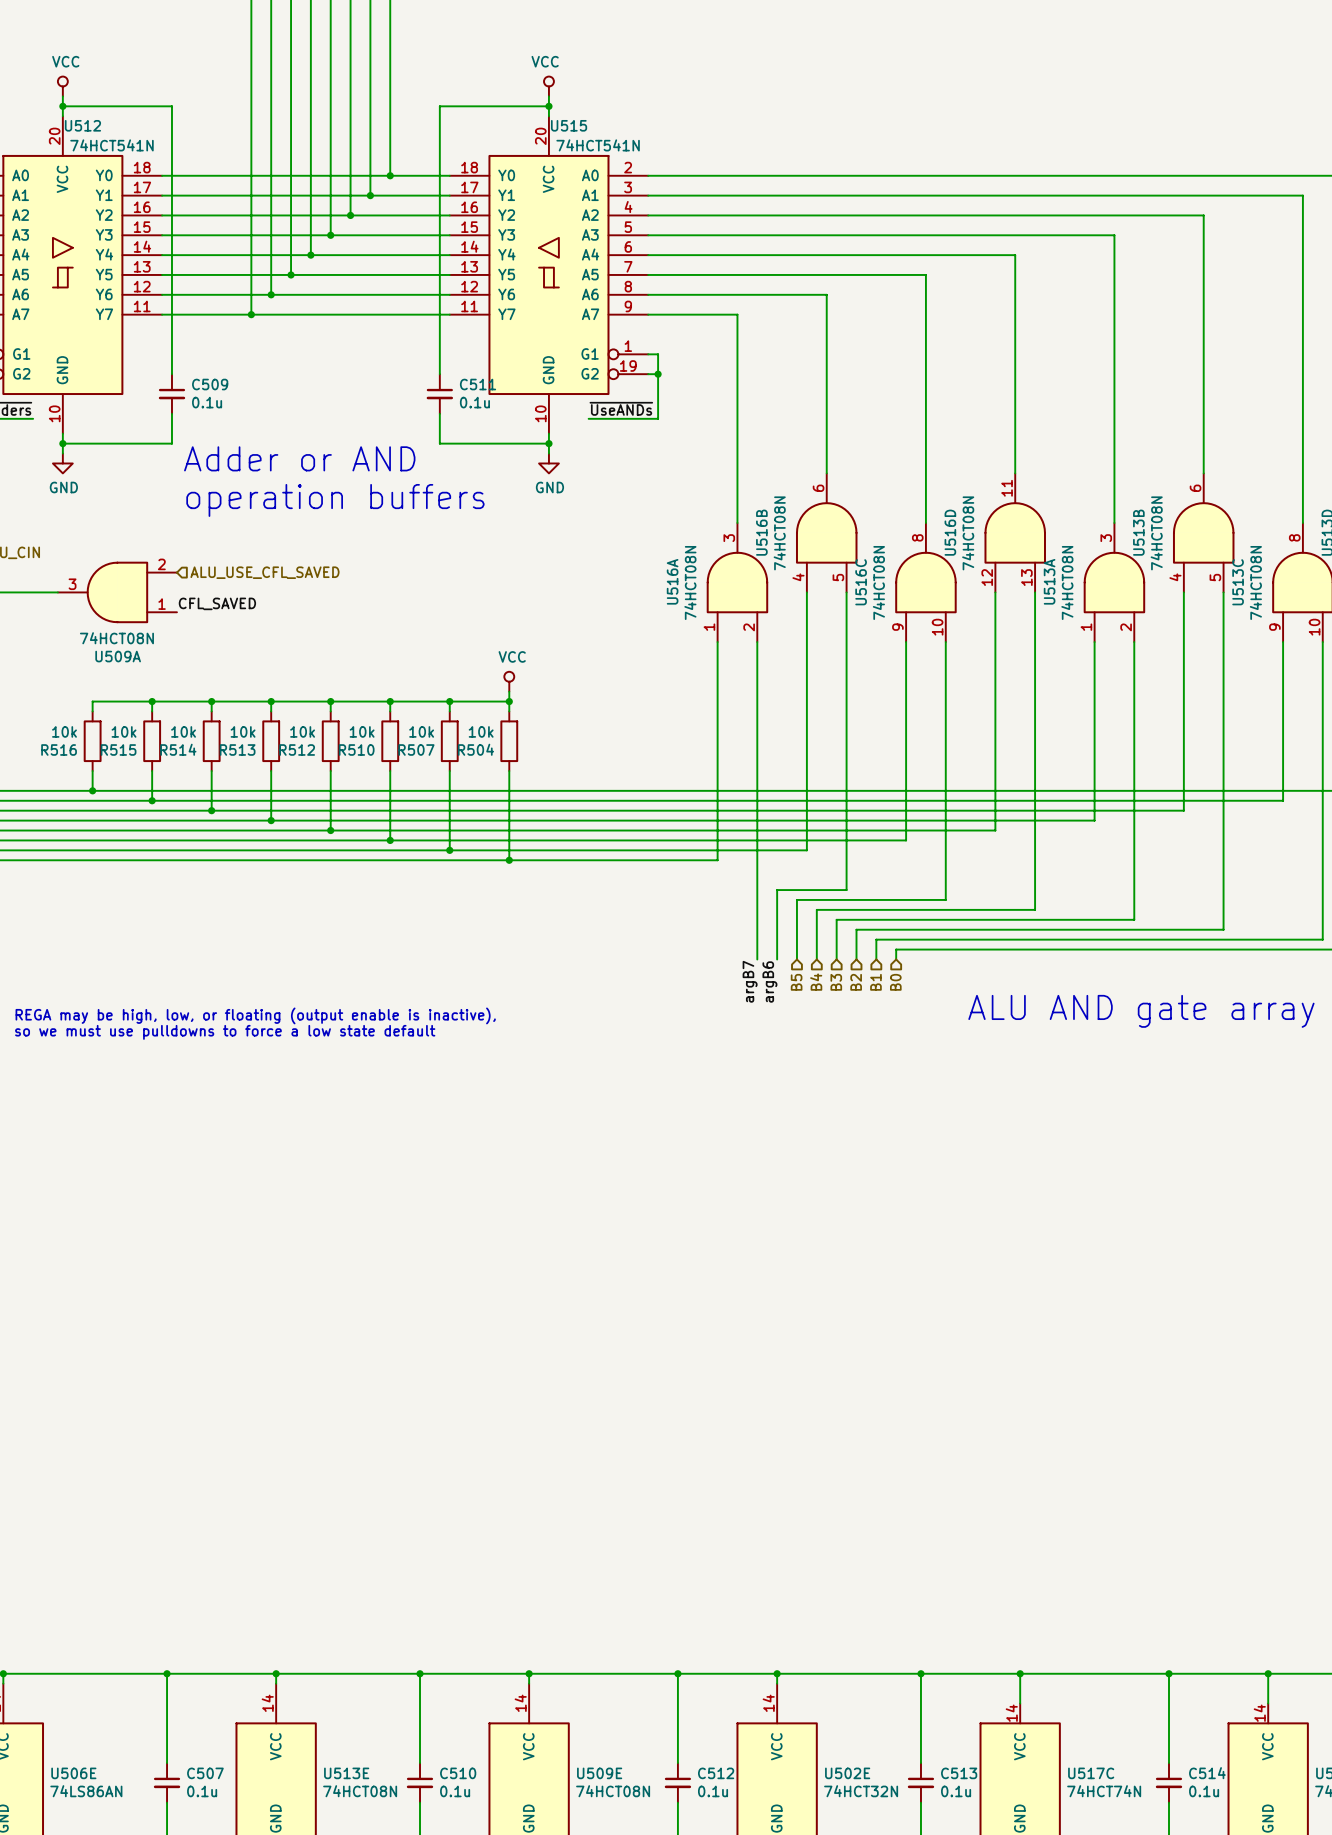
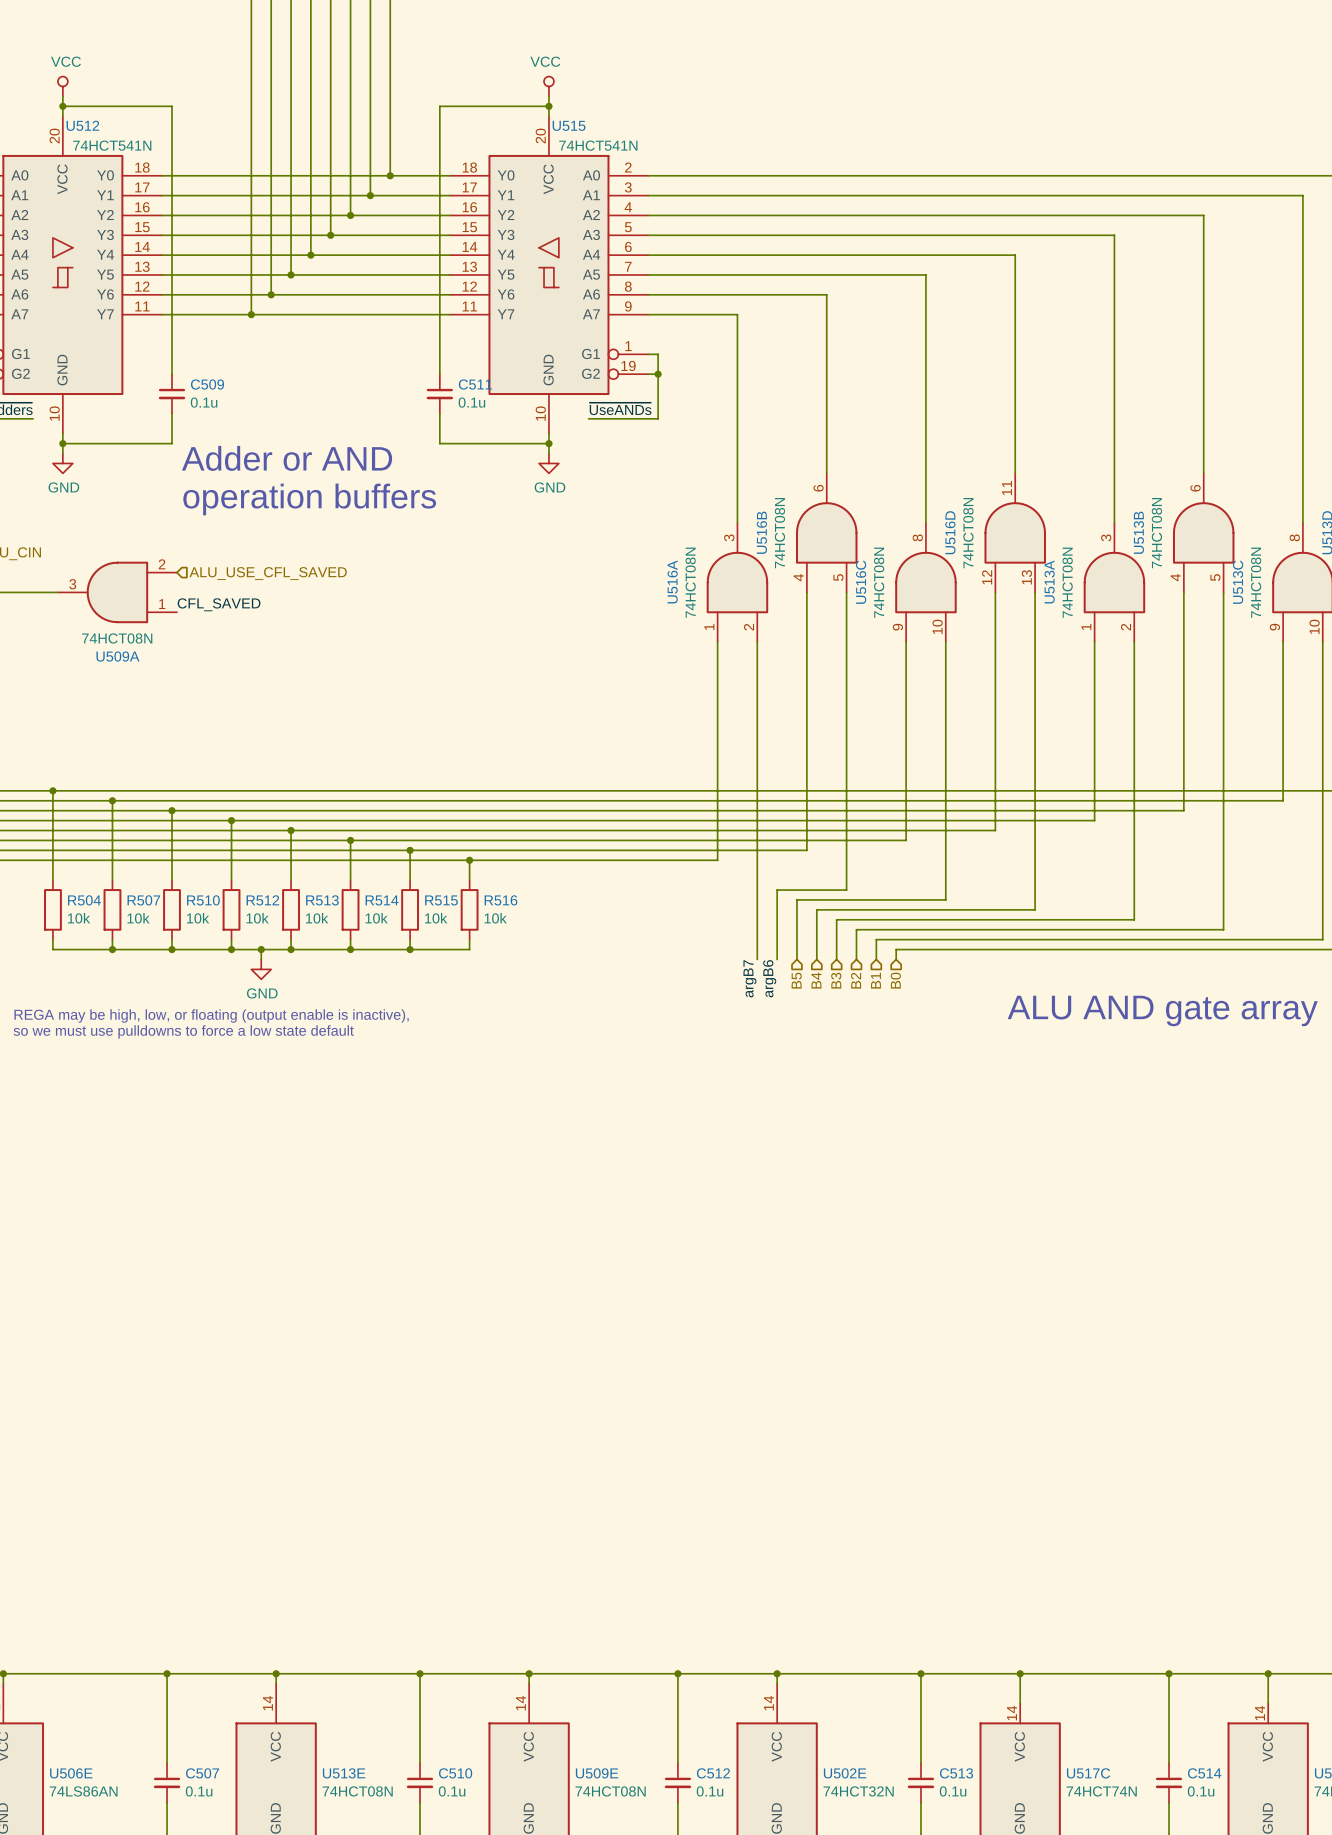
power symbol: VCC (509, 681) -> none
wire: (509, 691) (509, 711) -> (469, 860) (469, 880)
wire: (152, 701) (152, 711) -> none
junction: (152, 701) -> none
wire: (211, 701) (211, 711) -> none
junction: (211, 701) -> none
wire: (271, 701) (271, 711) -> none
junction: (271, 701) -> none
wire: (330, 701) (330, 711) -> none
junction: (330, 701) -> none
wire: (390, 701) (390, 711) -> none
junction: (390, 701) -> none
wire: (449, 701) (449, 711) -> none
junction: (449, 701) -> none
wire: (509, 701) (92, 701) (92, 711) -> none
junction: (509, 701) -> none
R516 value position: 10k (64, 731) -> 10k (495, 918)
R515 value position: 10k (124, 731) -> 10k (436, 918)
R514 value position: 10k (183, 731) -> 10k (376, 918)
R513 value position: 10k (243, 731) -> 10k (317, 918)
R512 value position: 10k (302, 731) -> 10k (257, 918)
R510 value position: 10k (362, 731) -> 10k (198, 918)
R507 value position: 10k (421, 731) -> 10k (138, 918)
R504 value position: 10k (481, 731) -> 10k (79, 918)
R516 position: (92, 741) -> (469, 909)
R515 position: (152, 741) -> (410, 909)
R514 position: (211, 741) -> (350, 909)
R513 position: (271, 741) -> (291, 909)
R512 position: (330, 741) -> (231, 909)
R510 position: (390, 741) -> (171, 909)
R507 position: (449, 741) -> (112, 909)
R504 position: (509, 741) -> (52, 909)
R516 name position: R516 (59, 749) -> R516 (501, 900)
R515 name position: R515 (118, 749) -> R515 (441, 900)
R514 name position: R514 (178, 749) -> R514 (382, 900)
R513 name position: R513 (237, 749) -> R513 (322, 900)
R512 name position: R512 (297, 749) -> R512 (262, 900)
R510 name position: R510 (356, 749) -> R510 (203, 900)
R507 name position: R507 (416, 749) -> R507 (143, 900)
R504 name position: R504 (475, 749) -> R504 (84, 900)
wire: (92, 771) (92, 790) -> none
wire: (152, 771) (152, 800) -> none
wire: (211, 771) (211, 810) -> (350, 840) (350, 880)
wire: (271, 771) (271, 820) -> (291, 830) (291, 880)
wire: (330, 771) (330, 830) -> (231, 820) (231, 880)
wire: (390, 771) (390, 840) -> none
wire: (449, 771) (449, 850) -> none
wire: (509, 771) (509, 860) -> none
wire: none -> (52, 790) (52, 880)
junction: none -> (52, 790)
junction: (92, 790) -> none
wire: none -> (112, 800) (112, 880)
junction: none -> (112, 800)
junction: (152, 800) -> none
wire: none -> (171, 810) (171, 880)
junction: none -> (171, 810)
junction: (211, 810) -> none
junction: none -> (231, 820)
junction: (271, 820) -> none
junction: none -> (291, 830)
junction: (330, 830) -> none
junction: none -> (350, 840)
junction: (390, 840) -> none
wire: none -> (410, 850) (410, 880)
junction: none -> (410, 850)
junction: (449, 850) -> none
junction: none -> (469, 860)
junction: (509, 860) -> none
wire: none -> (52, 939) (52, 949) (469, 949) (469, 939)
wire: none -> (112, 939) (112, 949)
wire: none -> (171, 939) (171, 949)
wire: none -> (231, 939) (231, 949)
wire: none -> (291, 939) (291, 949)
wire: none -> (350, 939) (350, 949)
wire: none -> (410, 939) (410, 949)
junction: none -> (112, 949)
junction: none -> (171, 949)
junction: none -> (231, 949)
wire: none -> (261, 949) (261, 959)
junction: none -> (261, 949)
junction: none -> (291, 949)
junction: none -> (350, 949)
junction: none -> (410, 949)
power symbol: none -> GND (261, 969)

